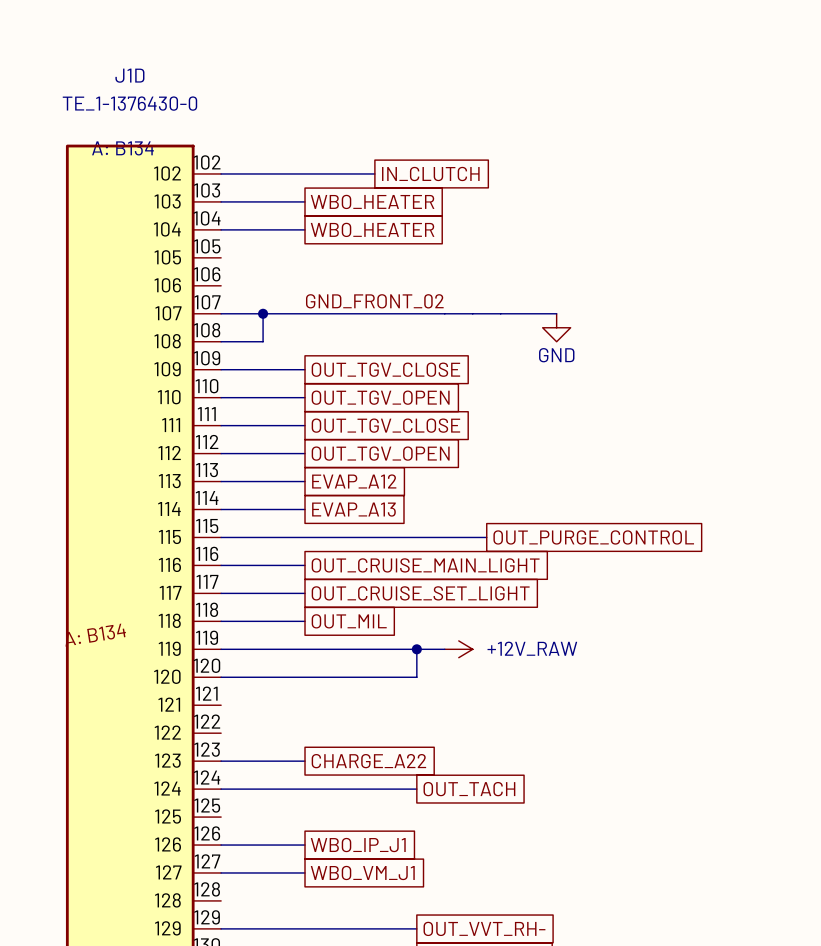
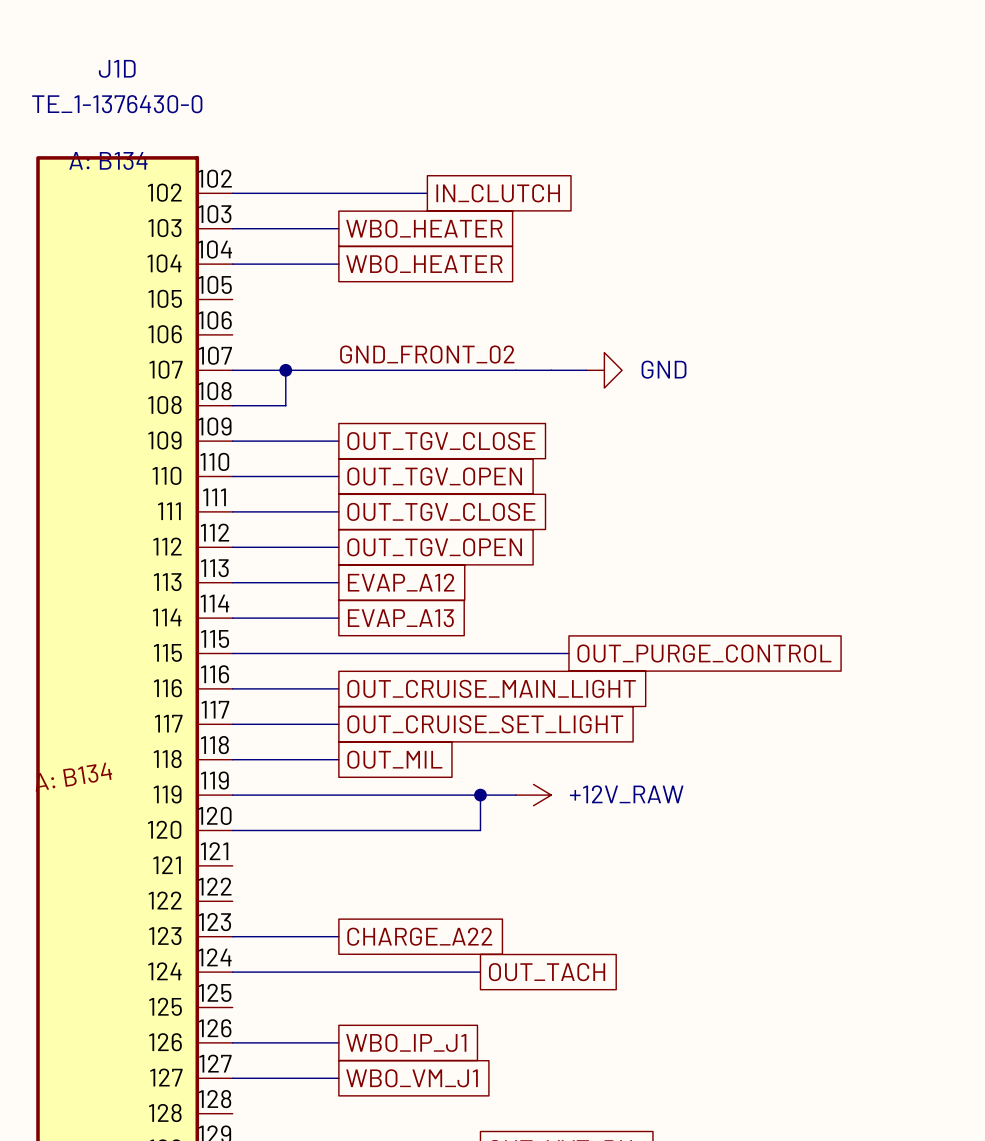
wire: (500, 313) (556, 313) -> none
power symbol rotation: 0° (556, 327) -> 90° counterclockwise (604, 370)
power symbol position: GND (556, 327) -> GND (604, 370)
power symbol text position: GND (556, 355) -> GND (664, 369)

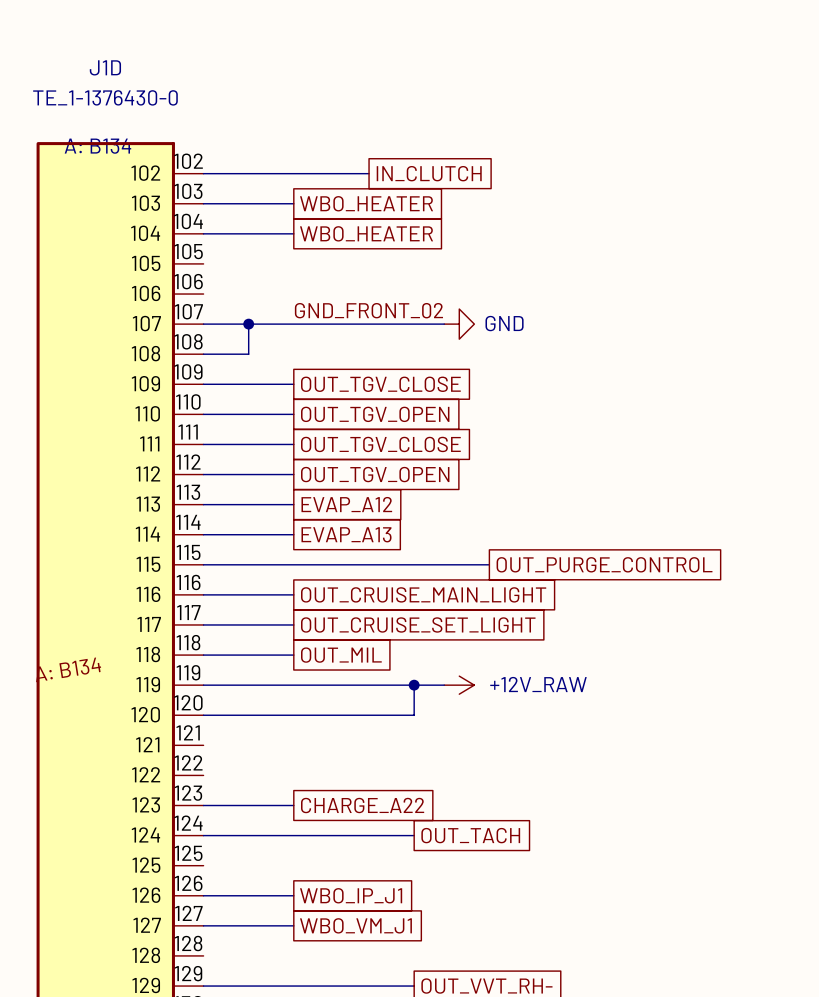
power symbol text position: GND (664, 369) -> GND (504, 323)
wire: (515, 370) (586, 370) -> none
power symbol position: GND (604, 370) -> GND (459, 324)

